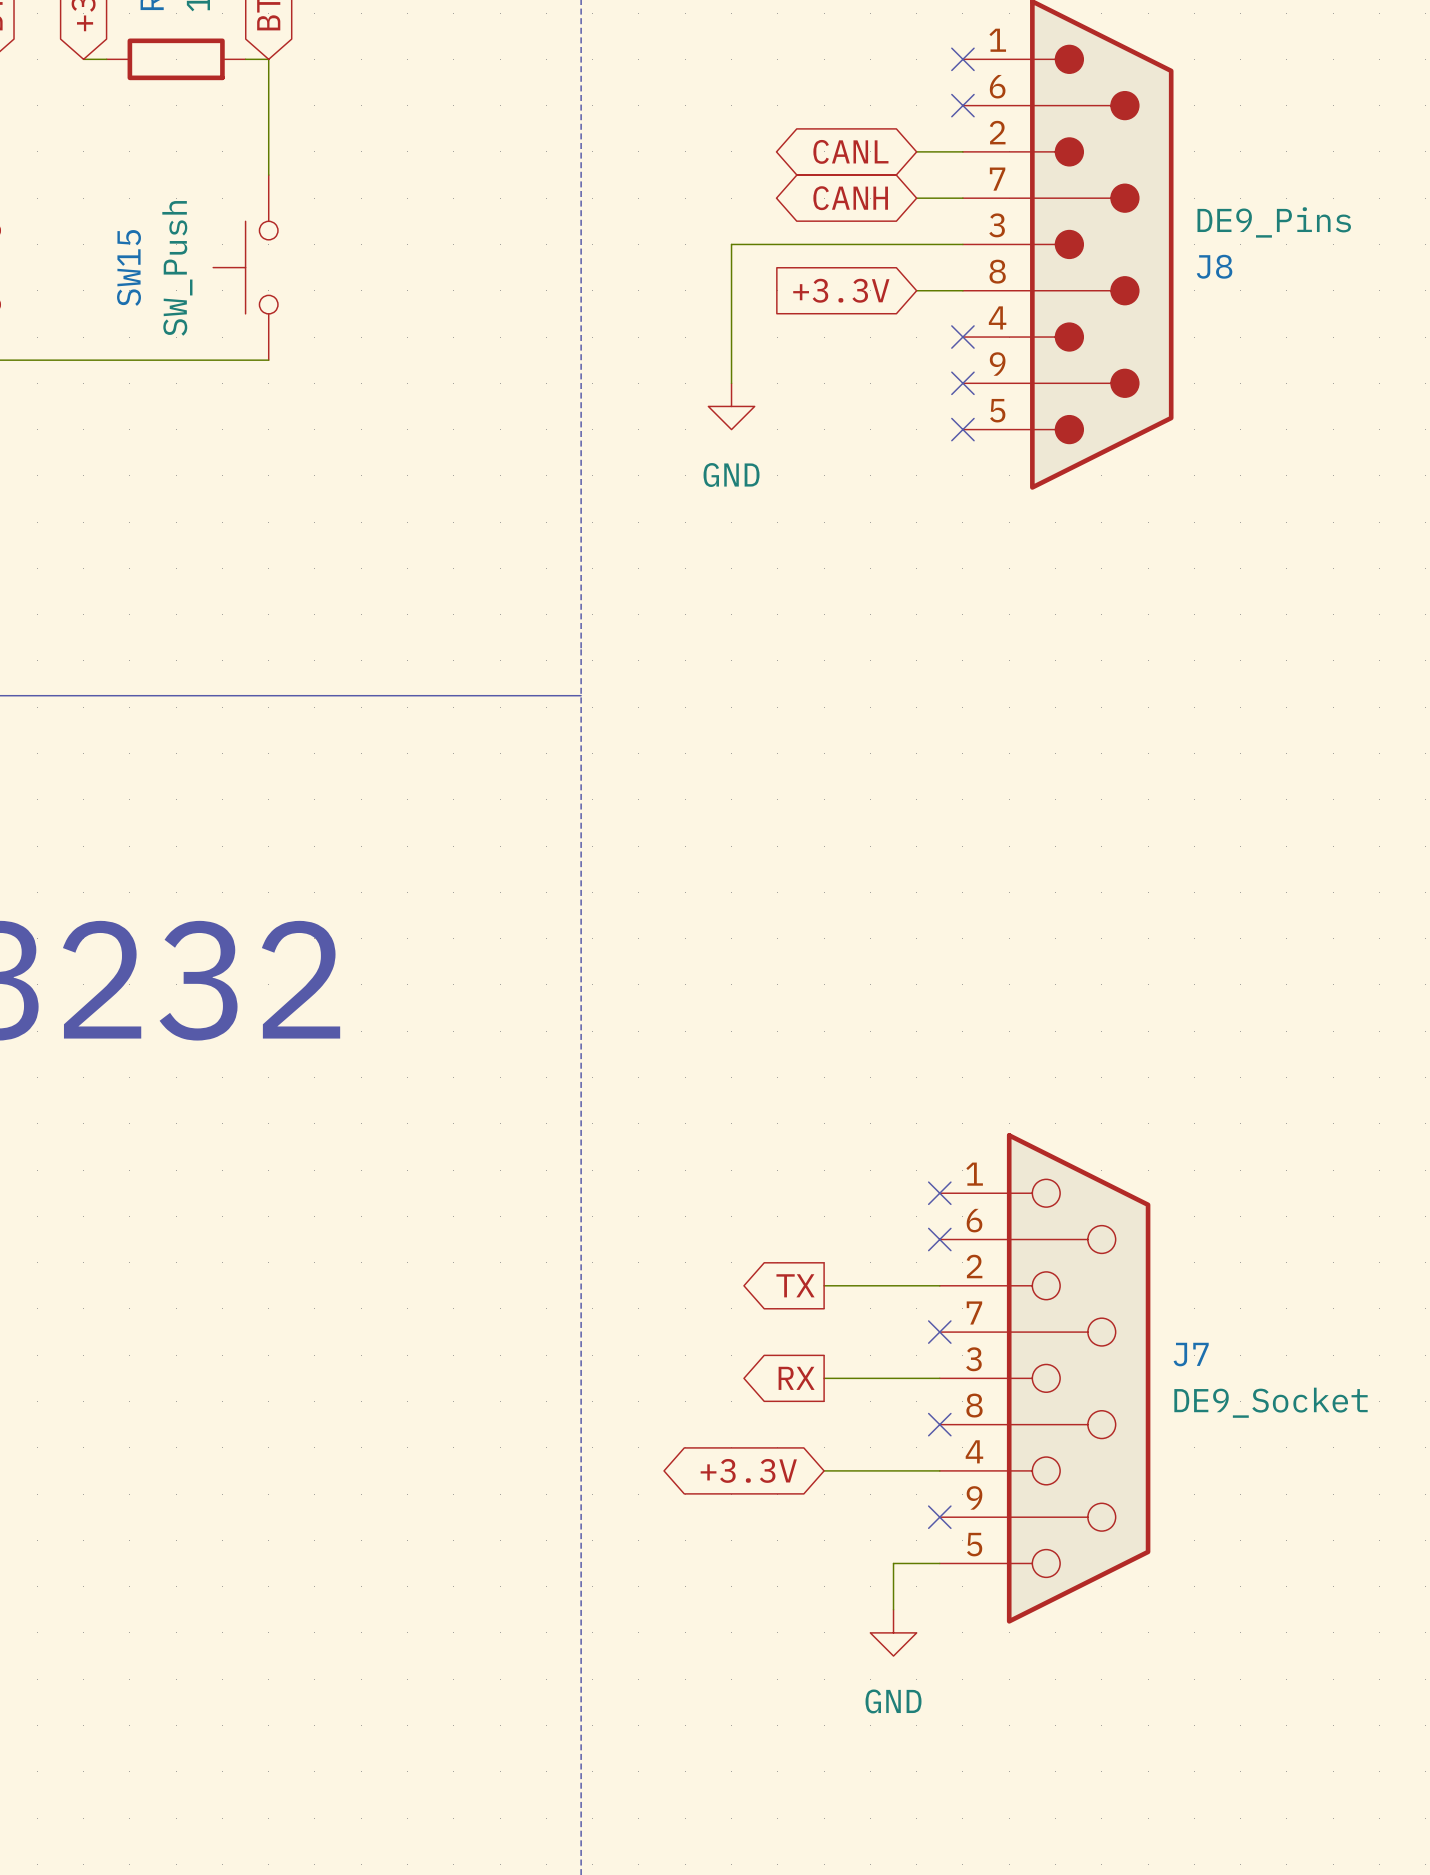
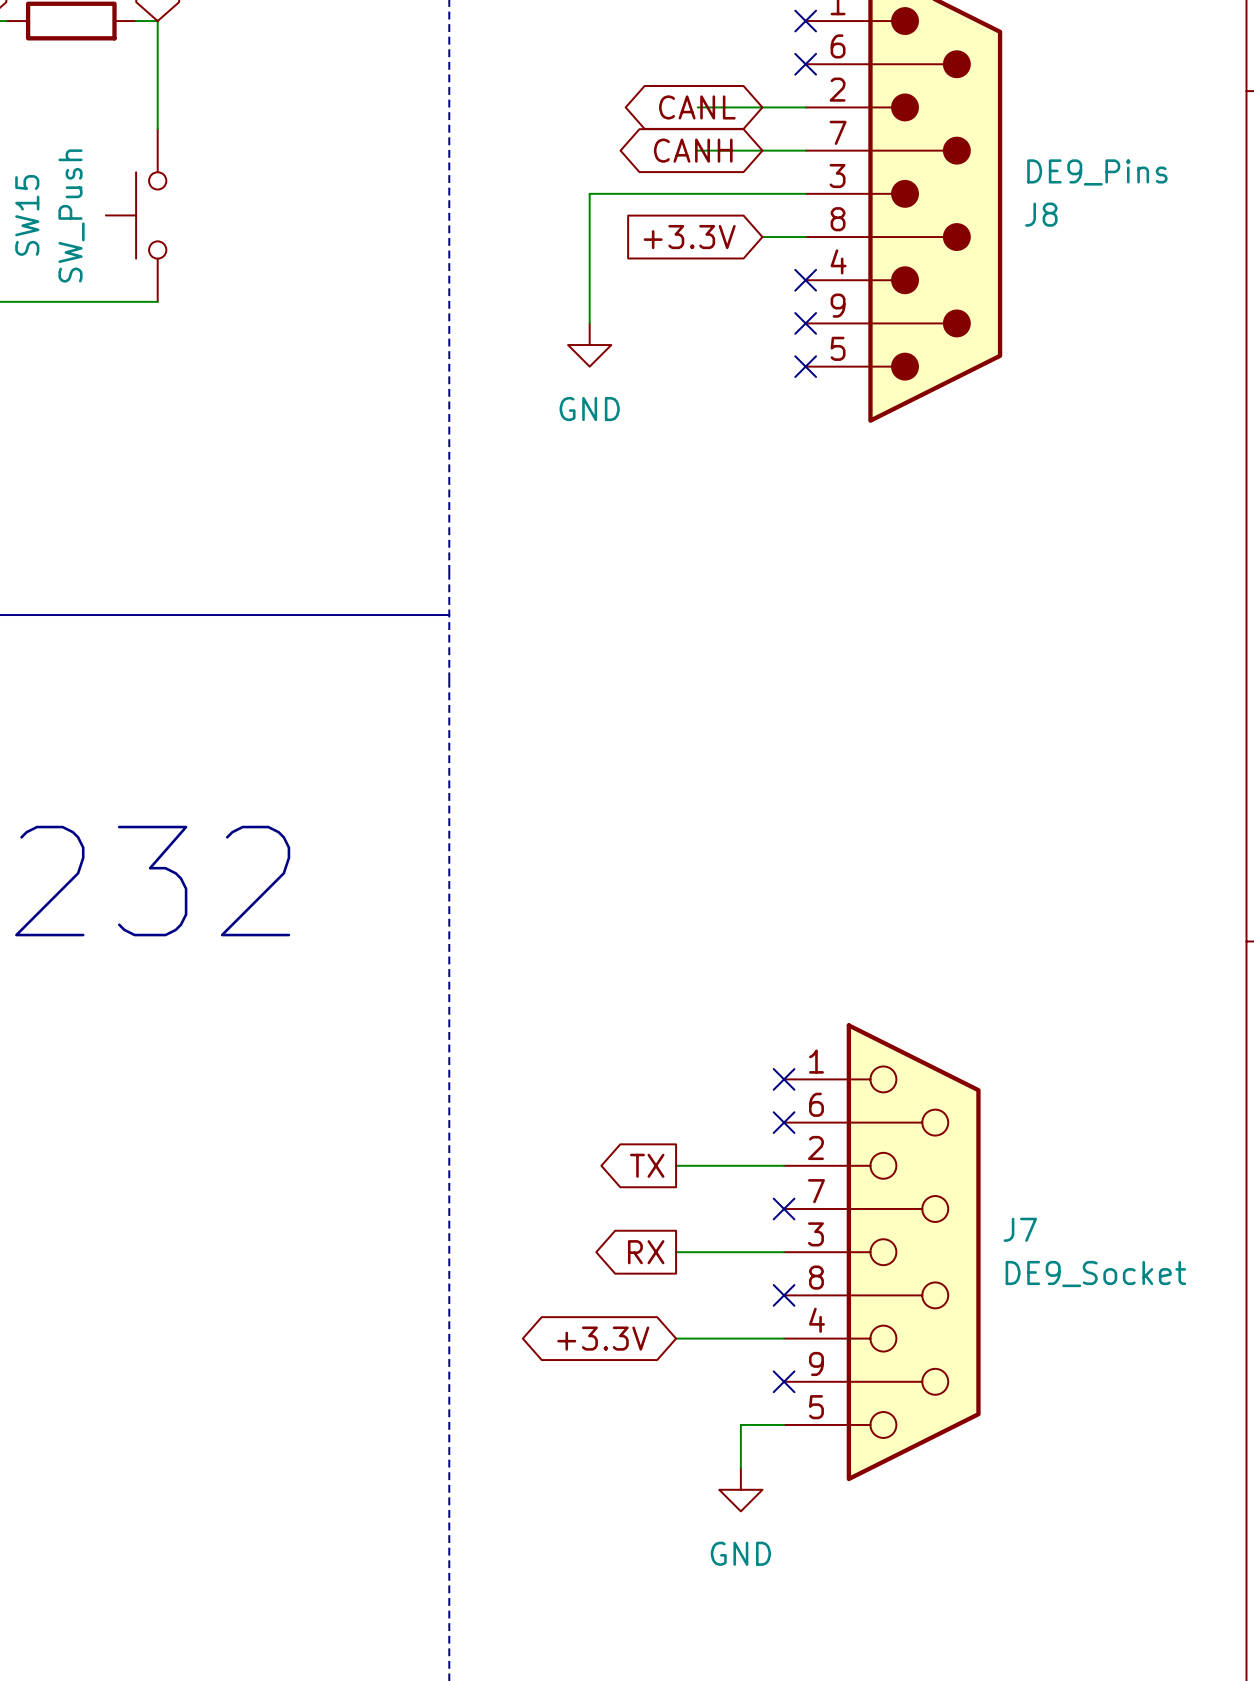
wire: none -> (697, 107) (762, 107)
wire: none -> (697, 150) (762, 150)

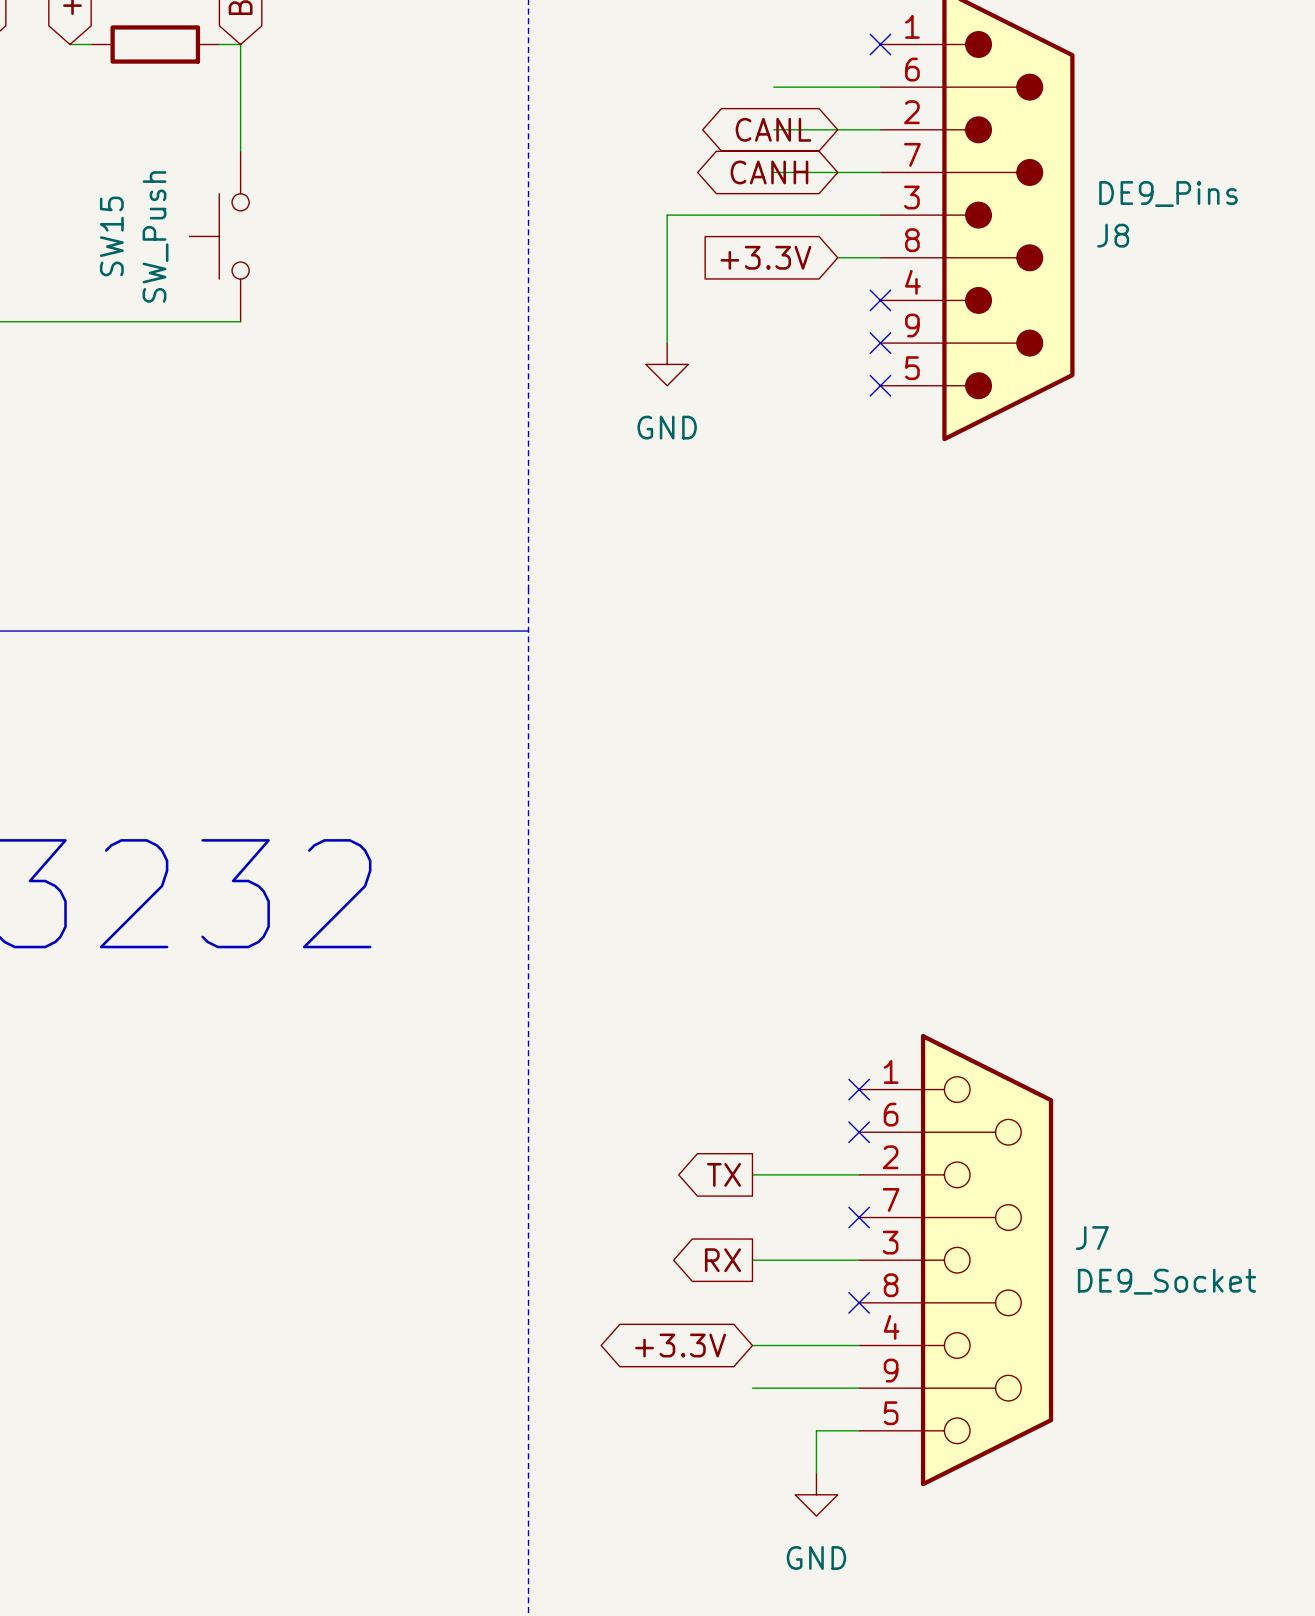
wire: none -> (773, 87) (880, 87)
no-connect mark: (805, 64) -> none
wire: none -> (752, 1388) (859, 1388)
no-connect mark: (784, 1381) -> none

